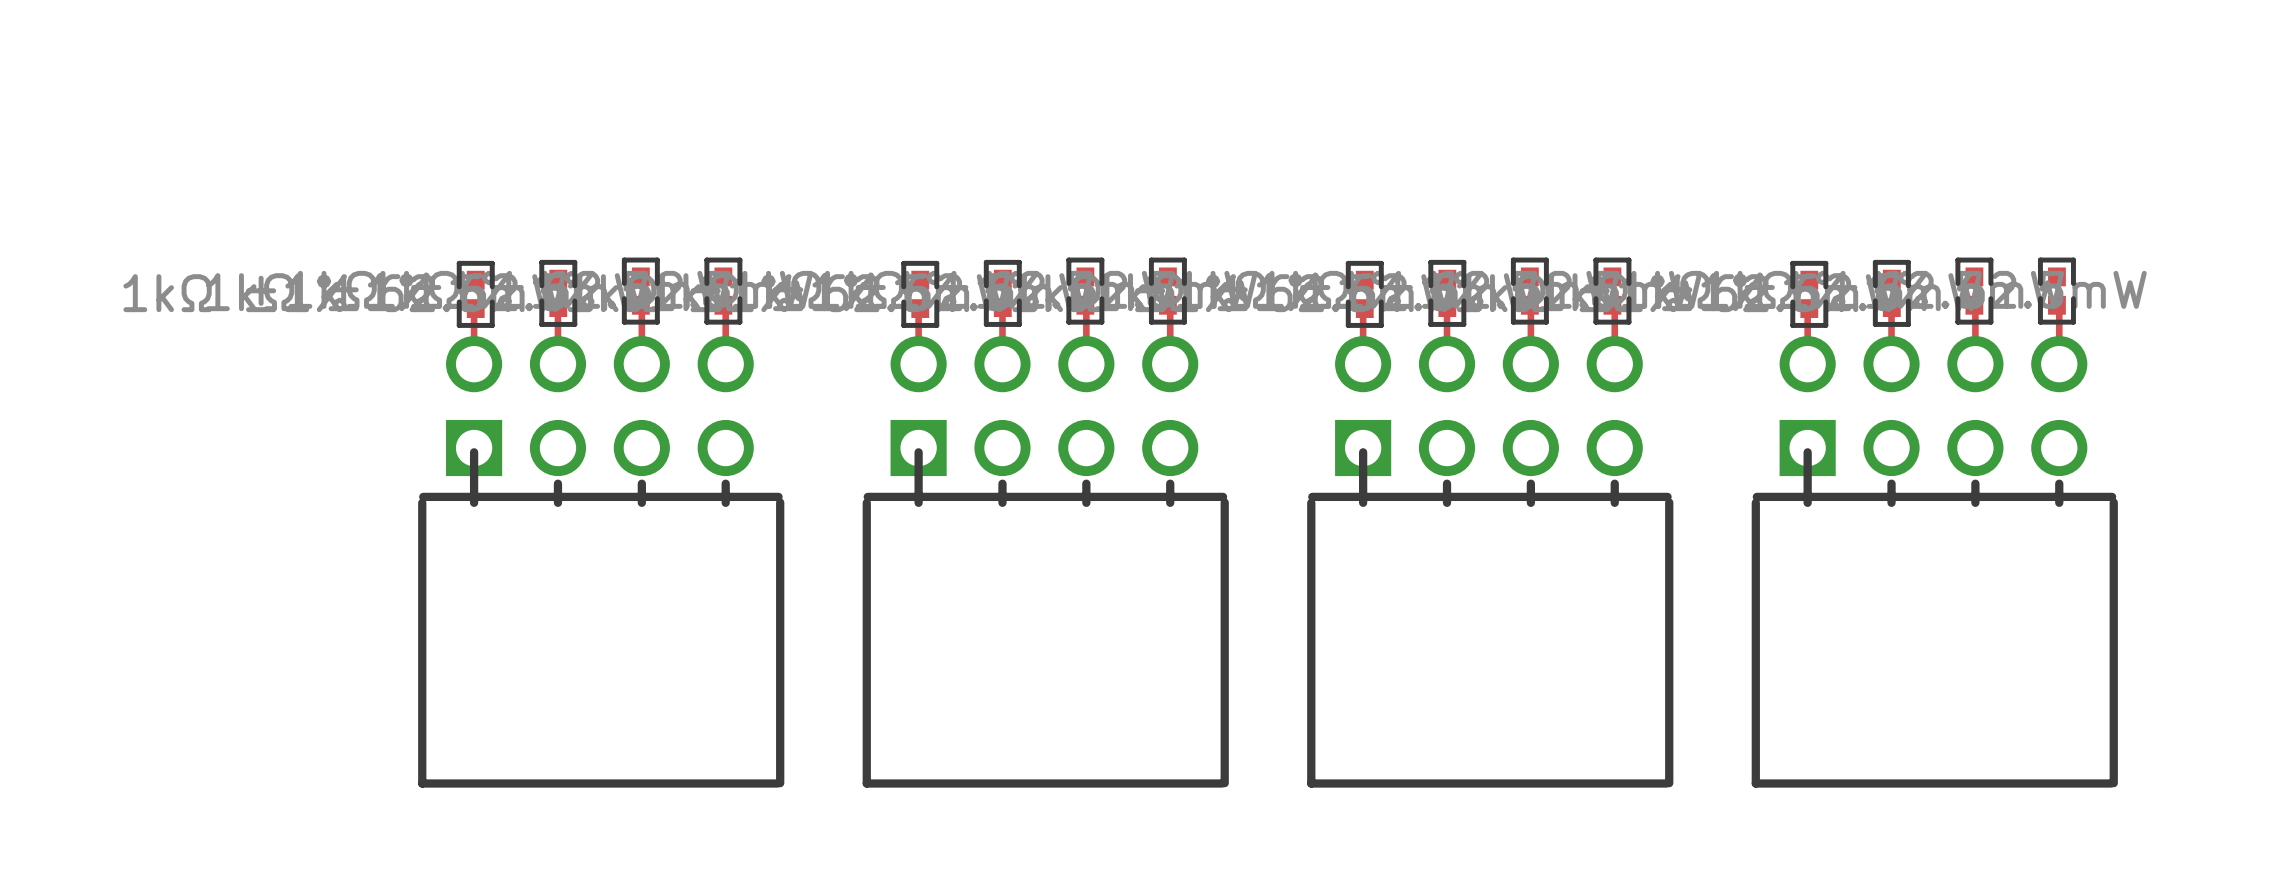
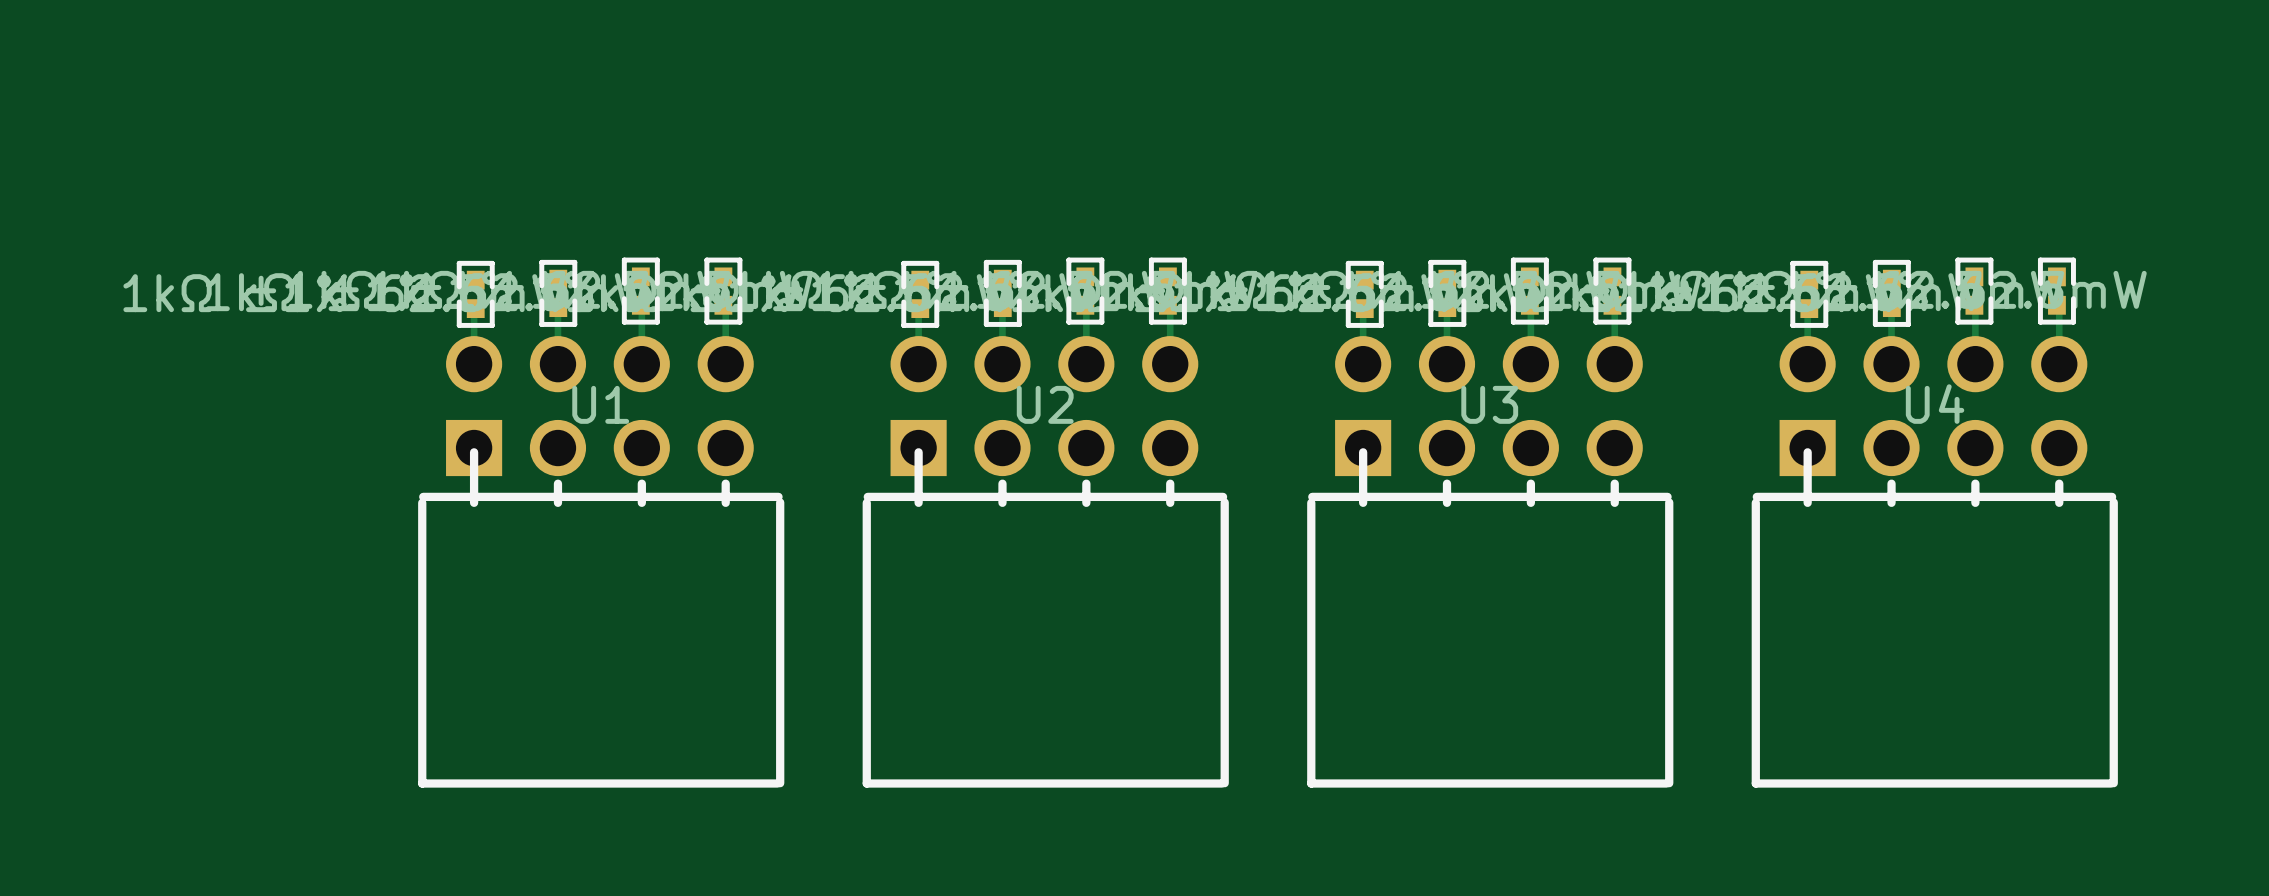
U1 name: none -> U1 (600, 404)
U2 name: none -> U2 (1045, 404)
U3 name: none -> U3 (1489, 404)
U4 name: none -> U4 (1935, 404)

